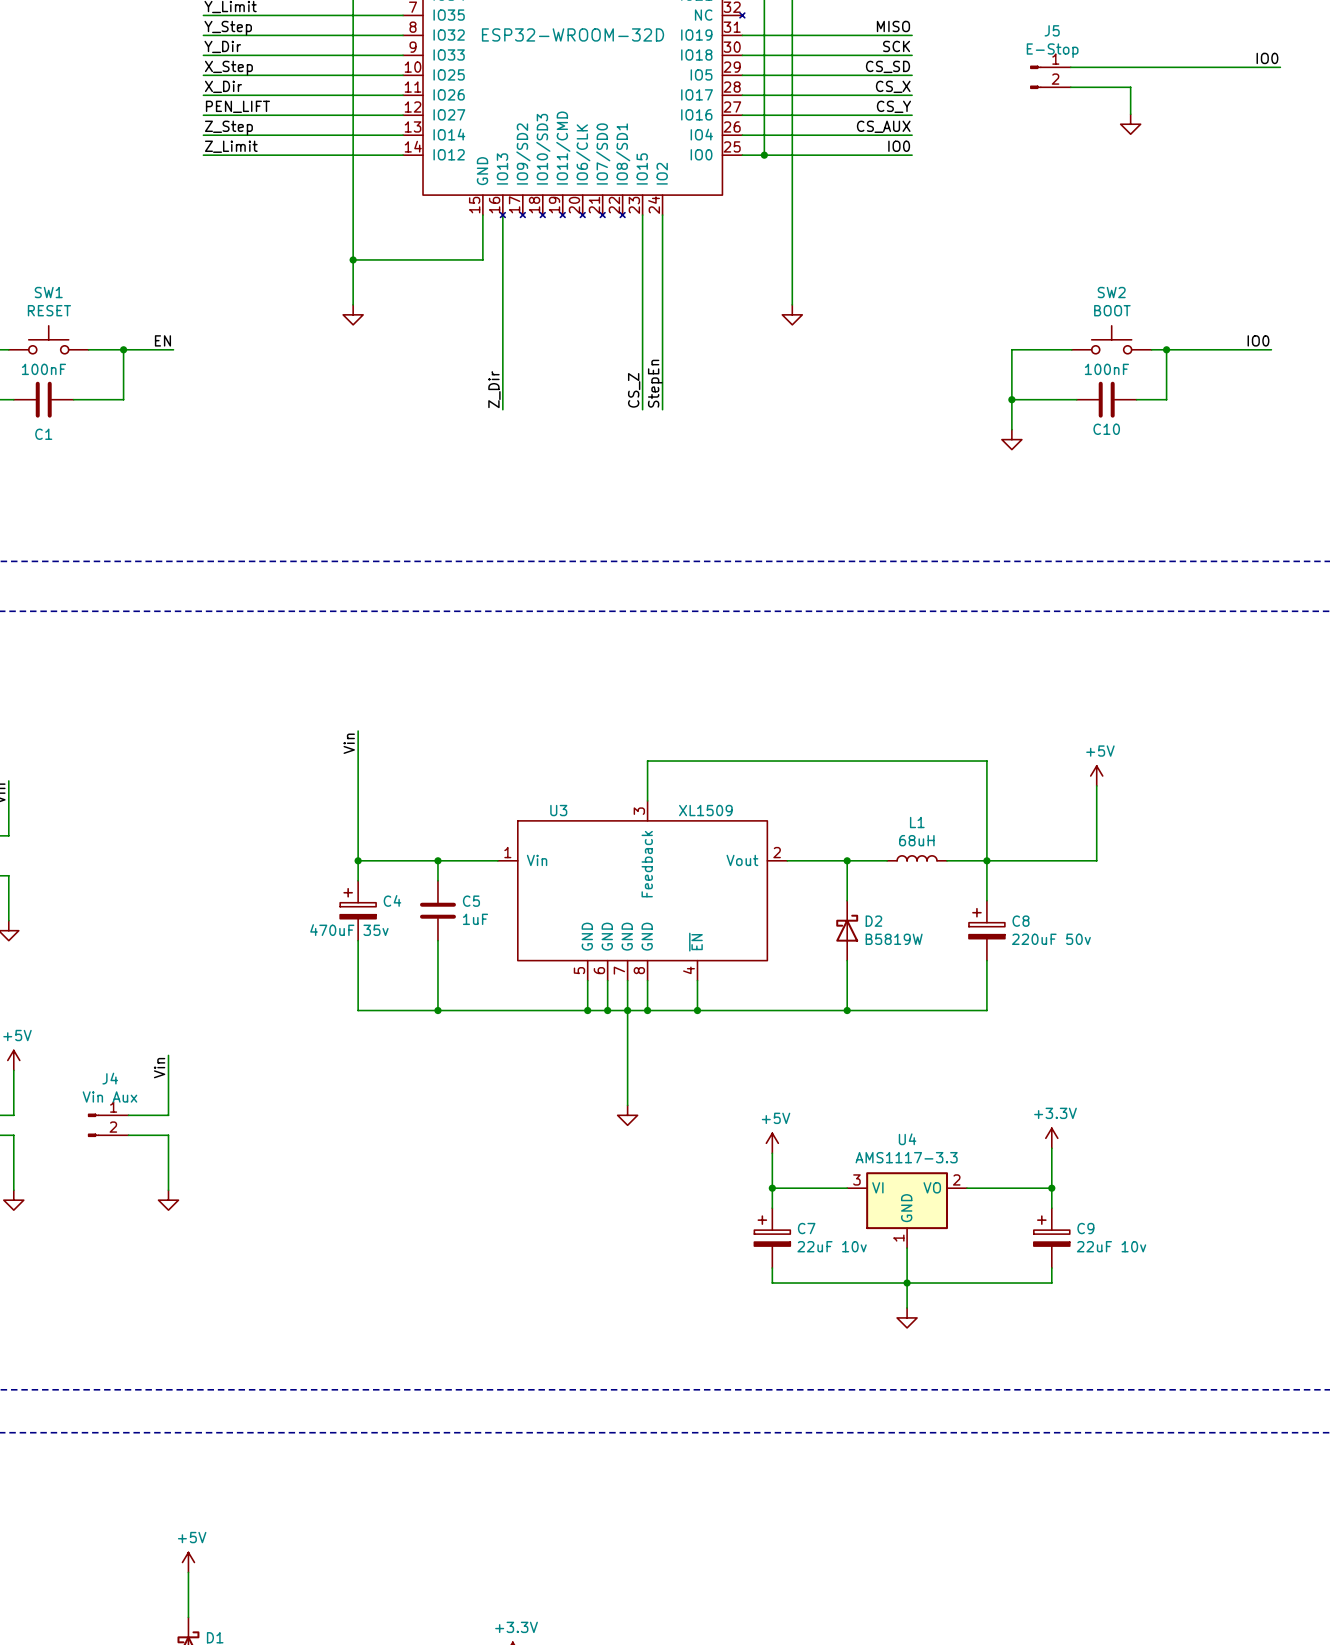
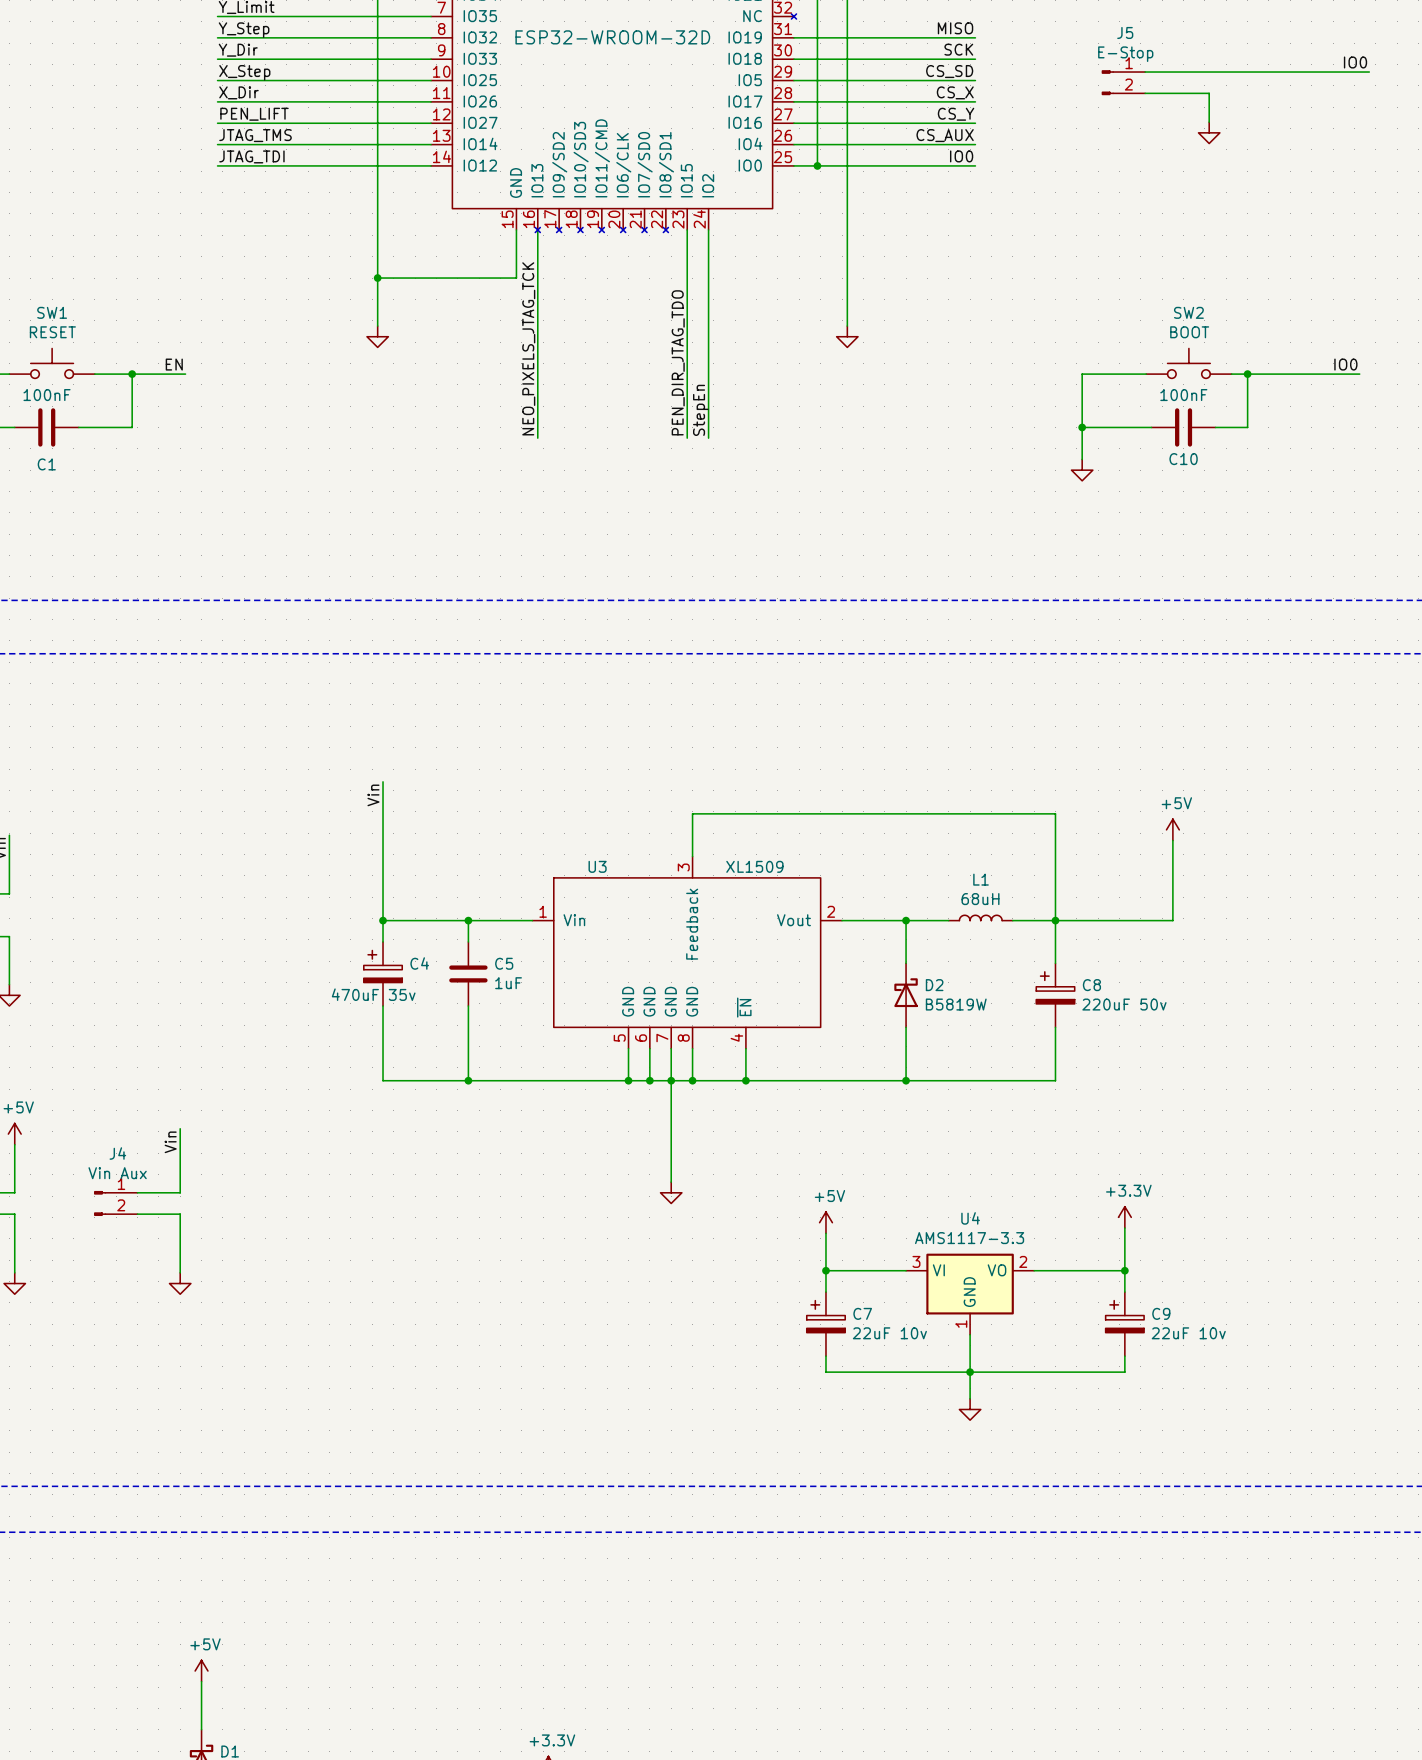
label: Z_Step (228, 127) -> JTAG_TMS (255, 135)
label: Z_Limit (231, 146) -> JTAG_TDI (251, 156)
label: Z_Dir (494, 389) -> NEO_PIXELS_JTAG_TCK (528, 348)
label: CS_Z (634, 390) -> PEN_DIR_JTAG_TDO (678, 362)

